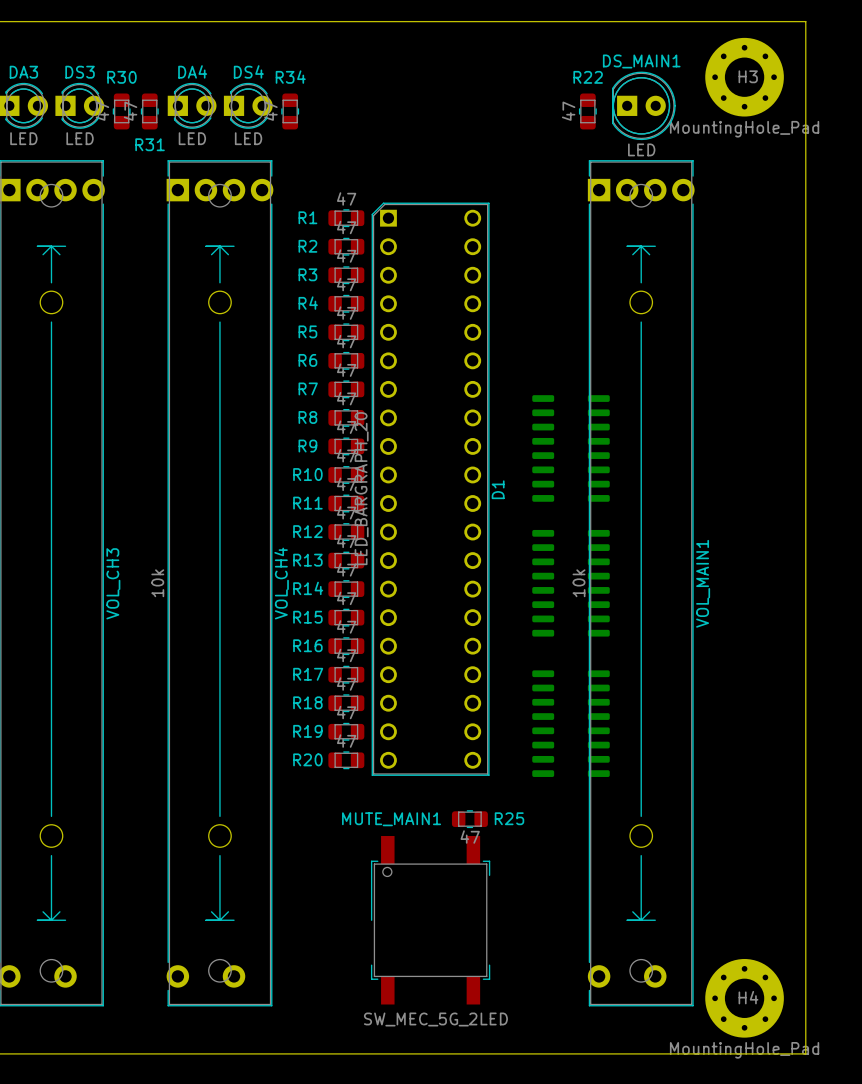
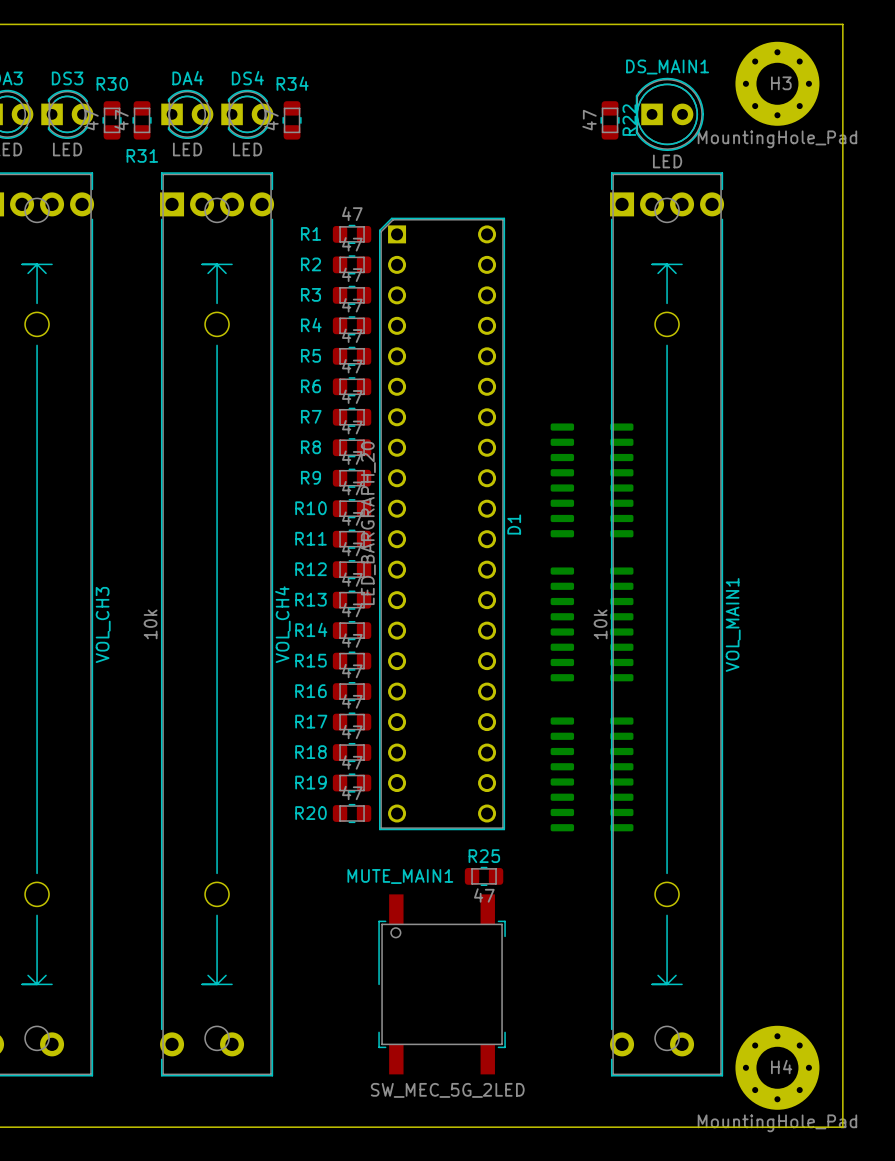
R22 name rotation: 0° (588, 77) -> 90° counterclockwise (629, 120)
R25 name position: R25 (509, 818) -> R25 (484, 856)

